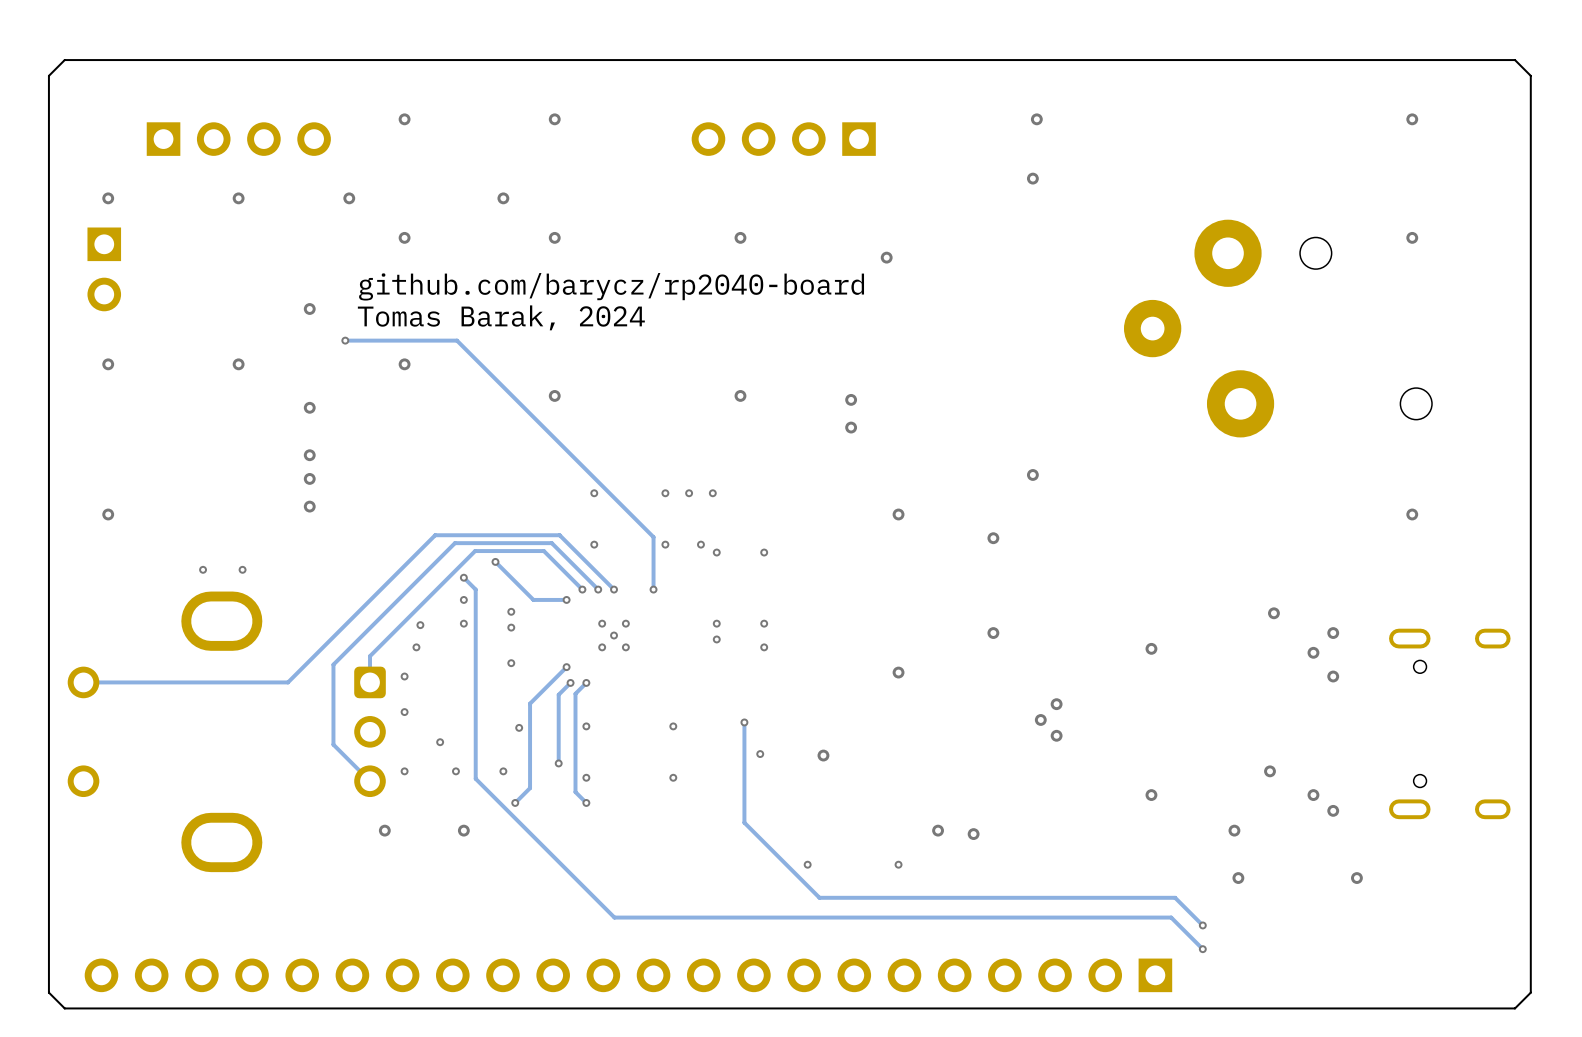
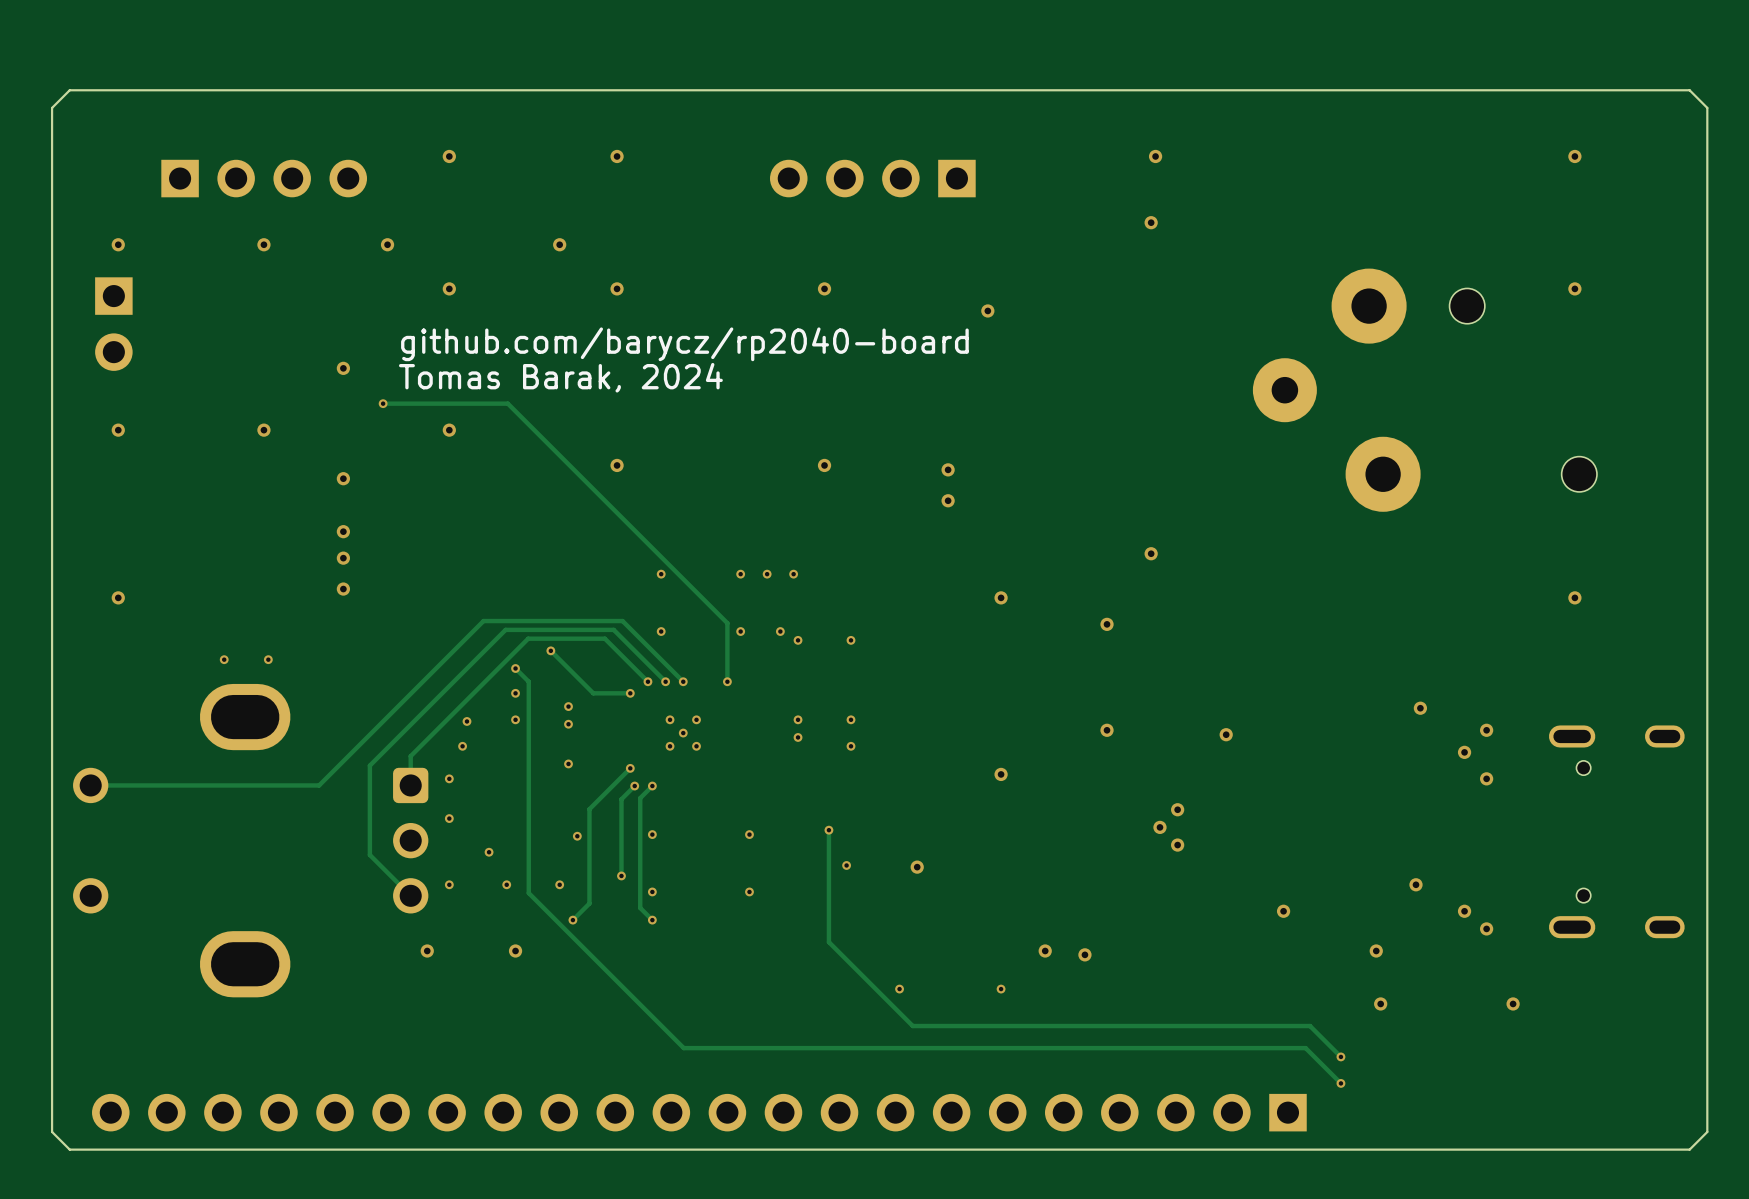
via position: (1151, 648) -> (1226, 734)

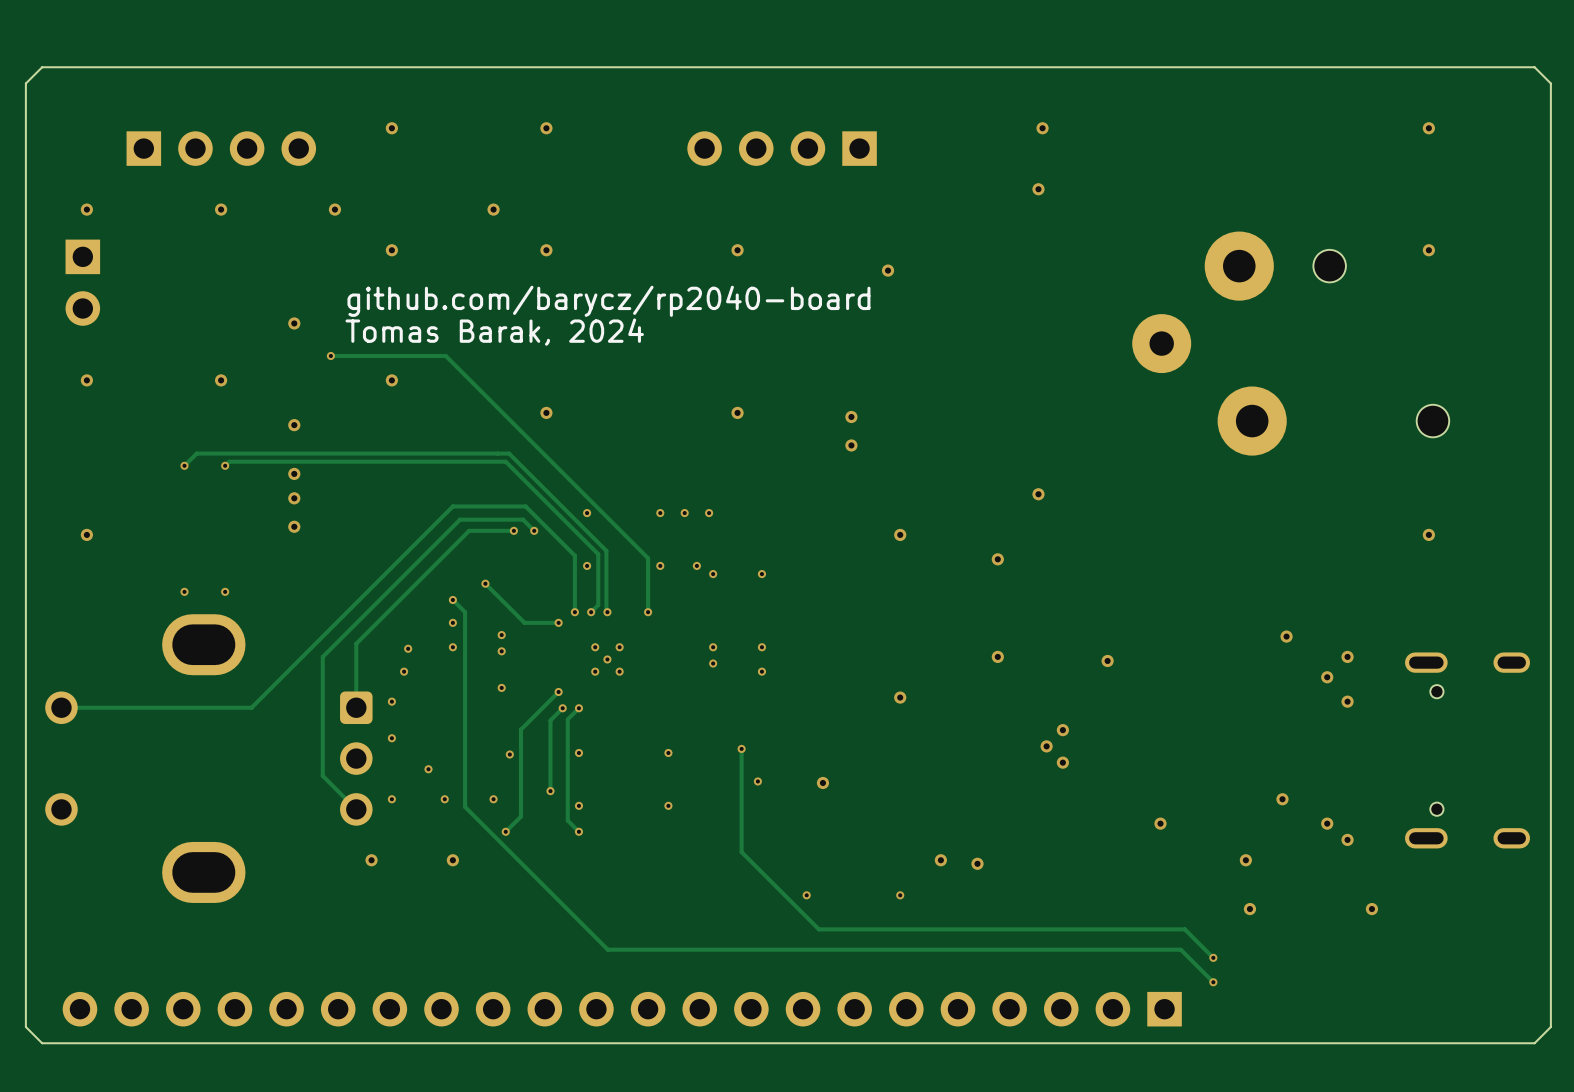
track: none -> (184, 465) (196, 453) (509, 453) (606, 550) (607, 612)
via: none -> (184, 465)
via: none -> (225, 465)
via: none -> (513, 530)
via: none -> (534, 530)
track: (483, 621) (622, 621) (683, 681) -> (423, 556) (460, 519) (523, 519) (534, 530)
track: (647, 681) (604, 638) (528, 638) (410, 756) -> (513, 530) (469, 530) (356, 643) (356, 680)
track: none -> (574, 612) (574, 555) (525, 506) (452, 506) (251, 707)
track: (665, 681) (613, 629) (505, 629) (369, 765) (369, 854) (374, 859) -> (591, 612) (598, 605) (598, 554) (505, 461) (229, 461) (225, 465)
track: (374, 730) (319, 785) (297, 785) -> (322, 656) (322, 775)

